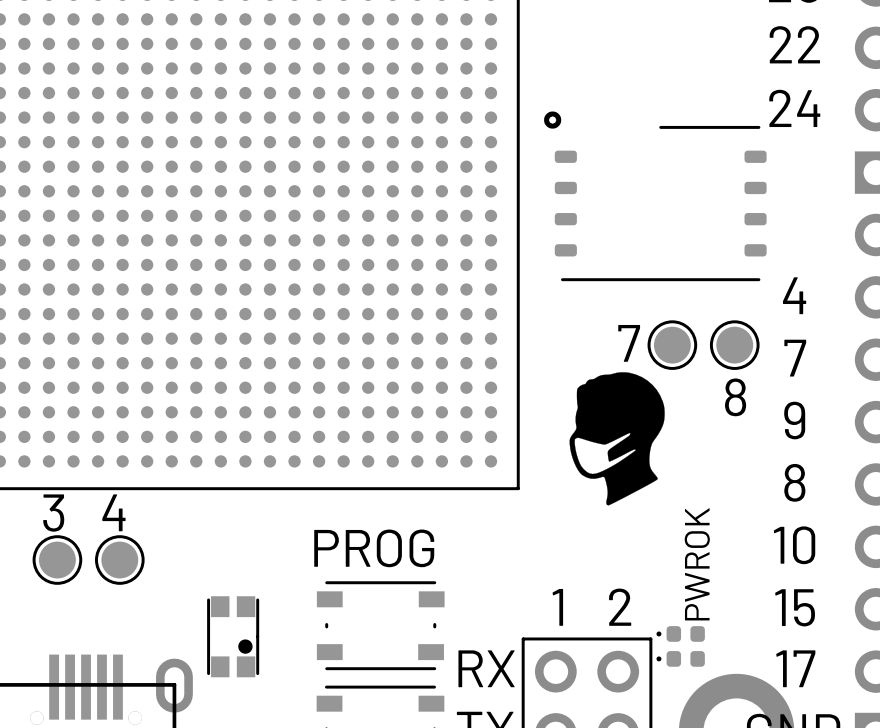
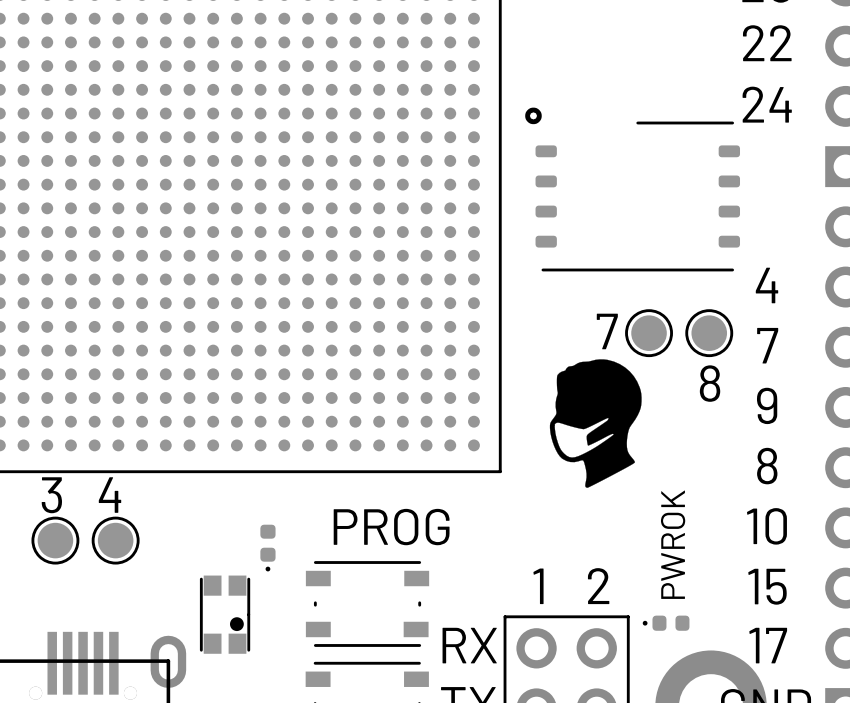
text position: PROG (374, 548) -> PROG (391, 527)
part: none -> (267, 548)
part: (680, 633) -> none
part: none -> (666, 623)
part: (680, 658) -> none

